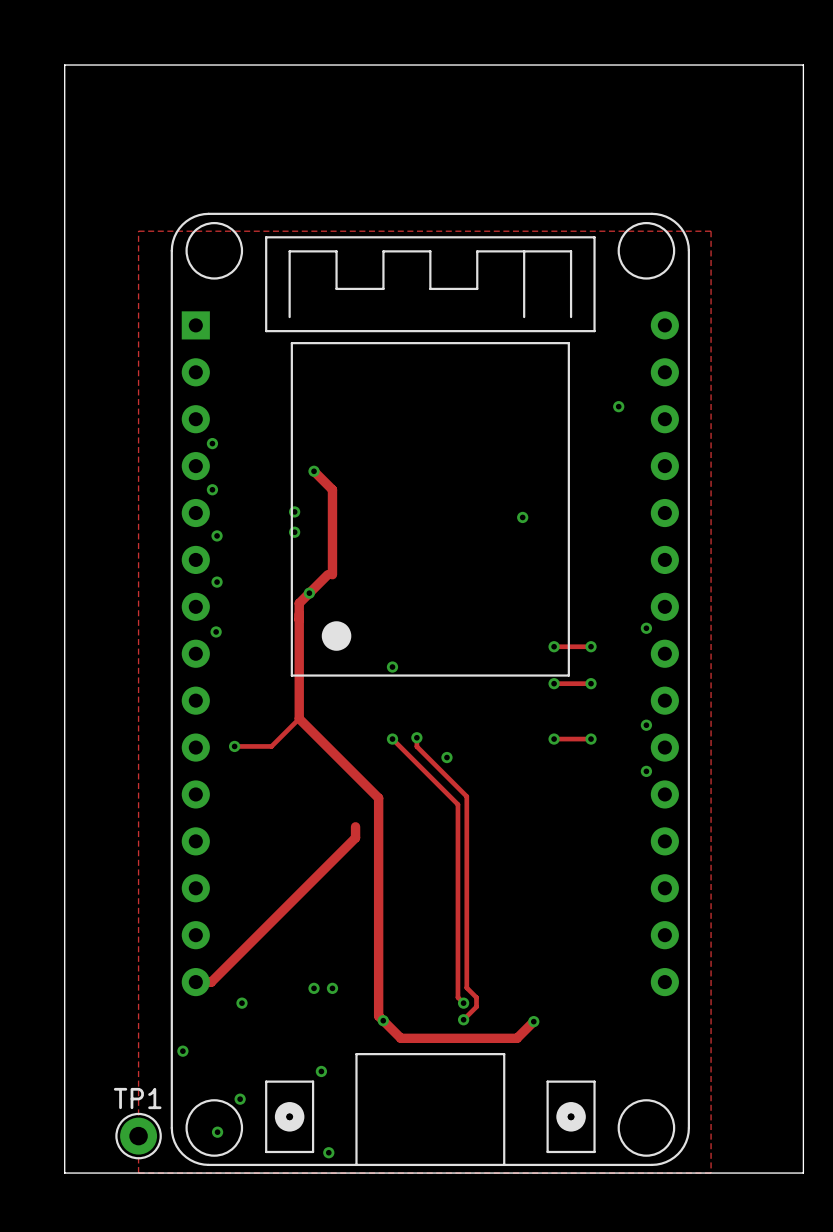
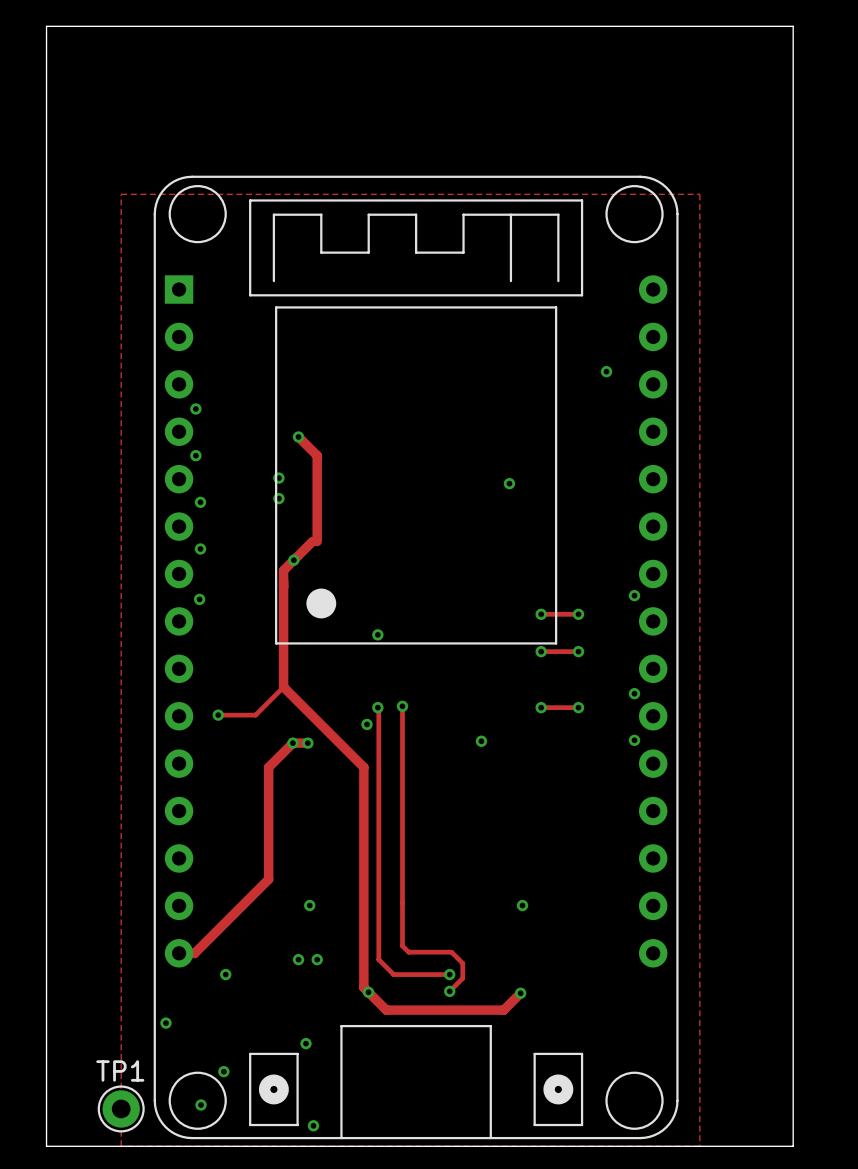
track: (393, 739) (457, 804) (457, 997) (463, 1003) -> (378, 708) (378, 959) (393, 974) (449, 974)
track: (416, 746) (466, 796) (466, 987) (476, 997) -> (402, 715) (402, 946) (408, 952) (451, 952) (462, 963) (462, 968)
via: none -> (366, 724)
via: (446, 757) -> none
via: none -> (481, 741)
via: none -> (292, 743)
via: none -> (307, 743)
track: (355, 826) (355, 837) (284, 908) -> (307, 743) (292, 743) (268, 767) (268, 879)
via: none -> (309, 905)
via: none -> (522, 905)

